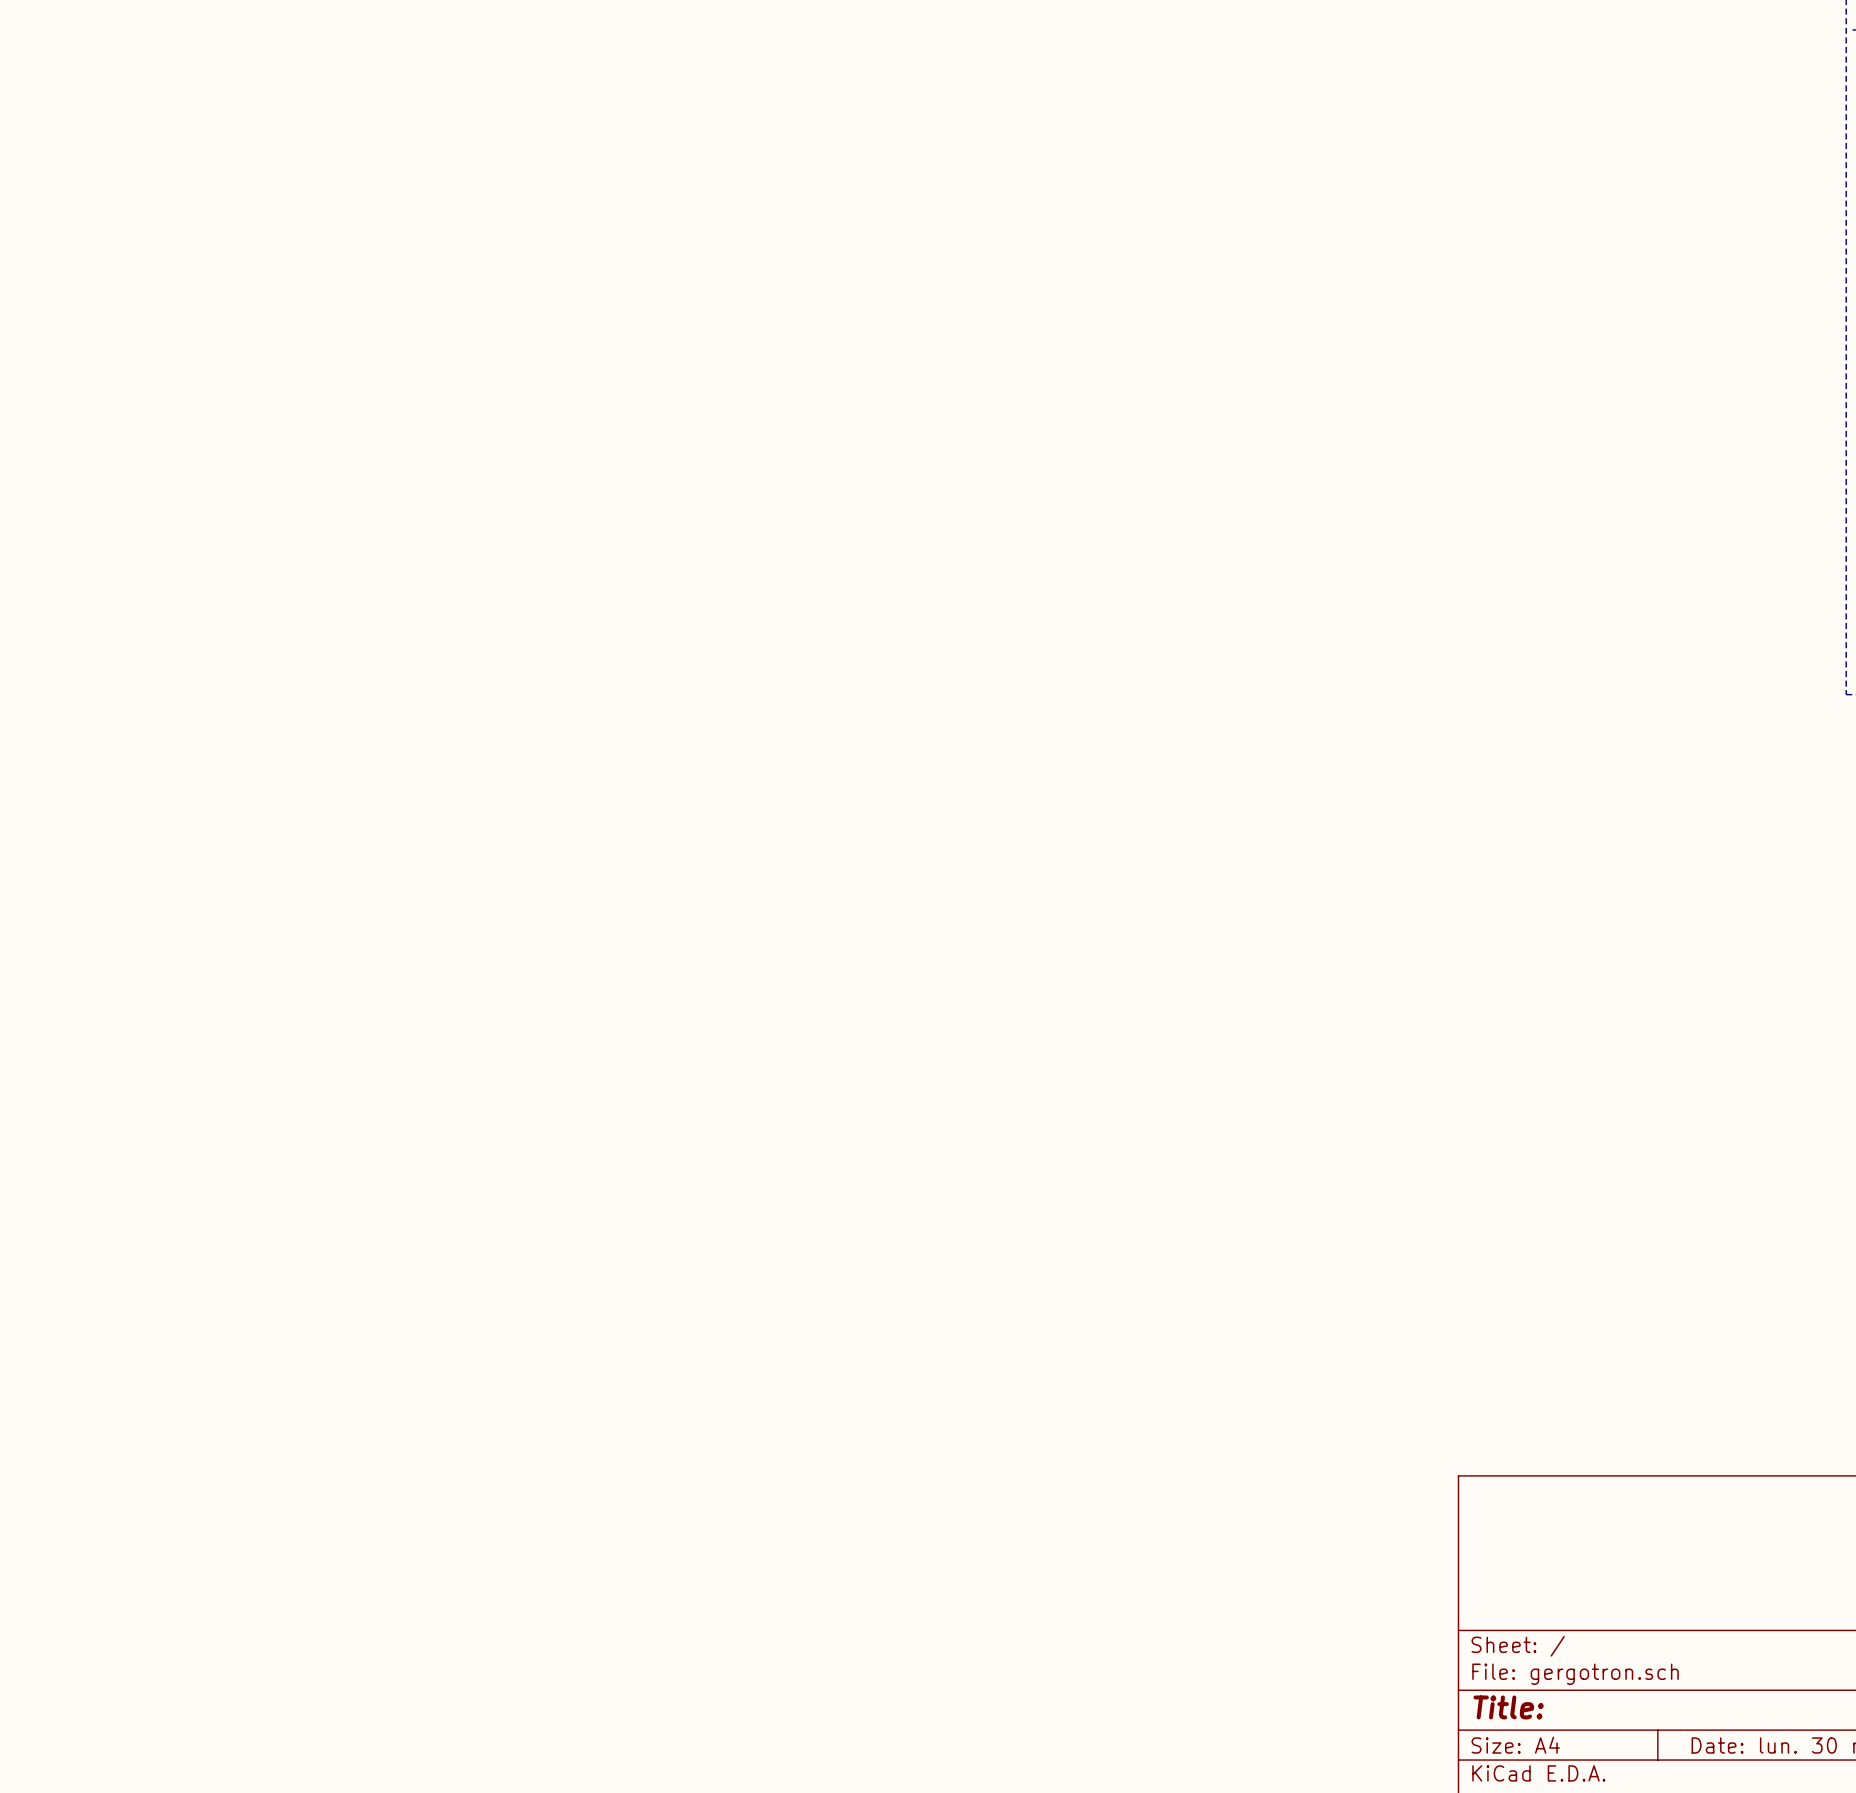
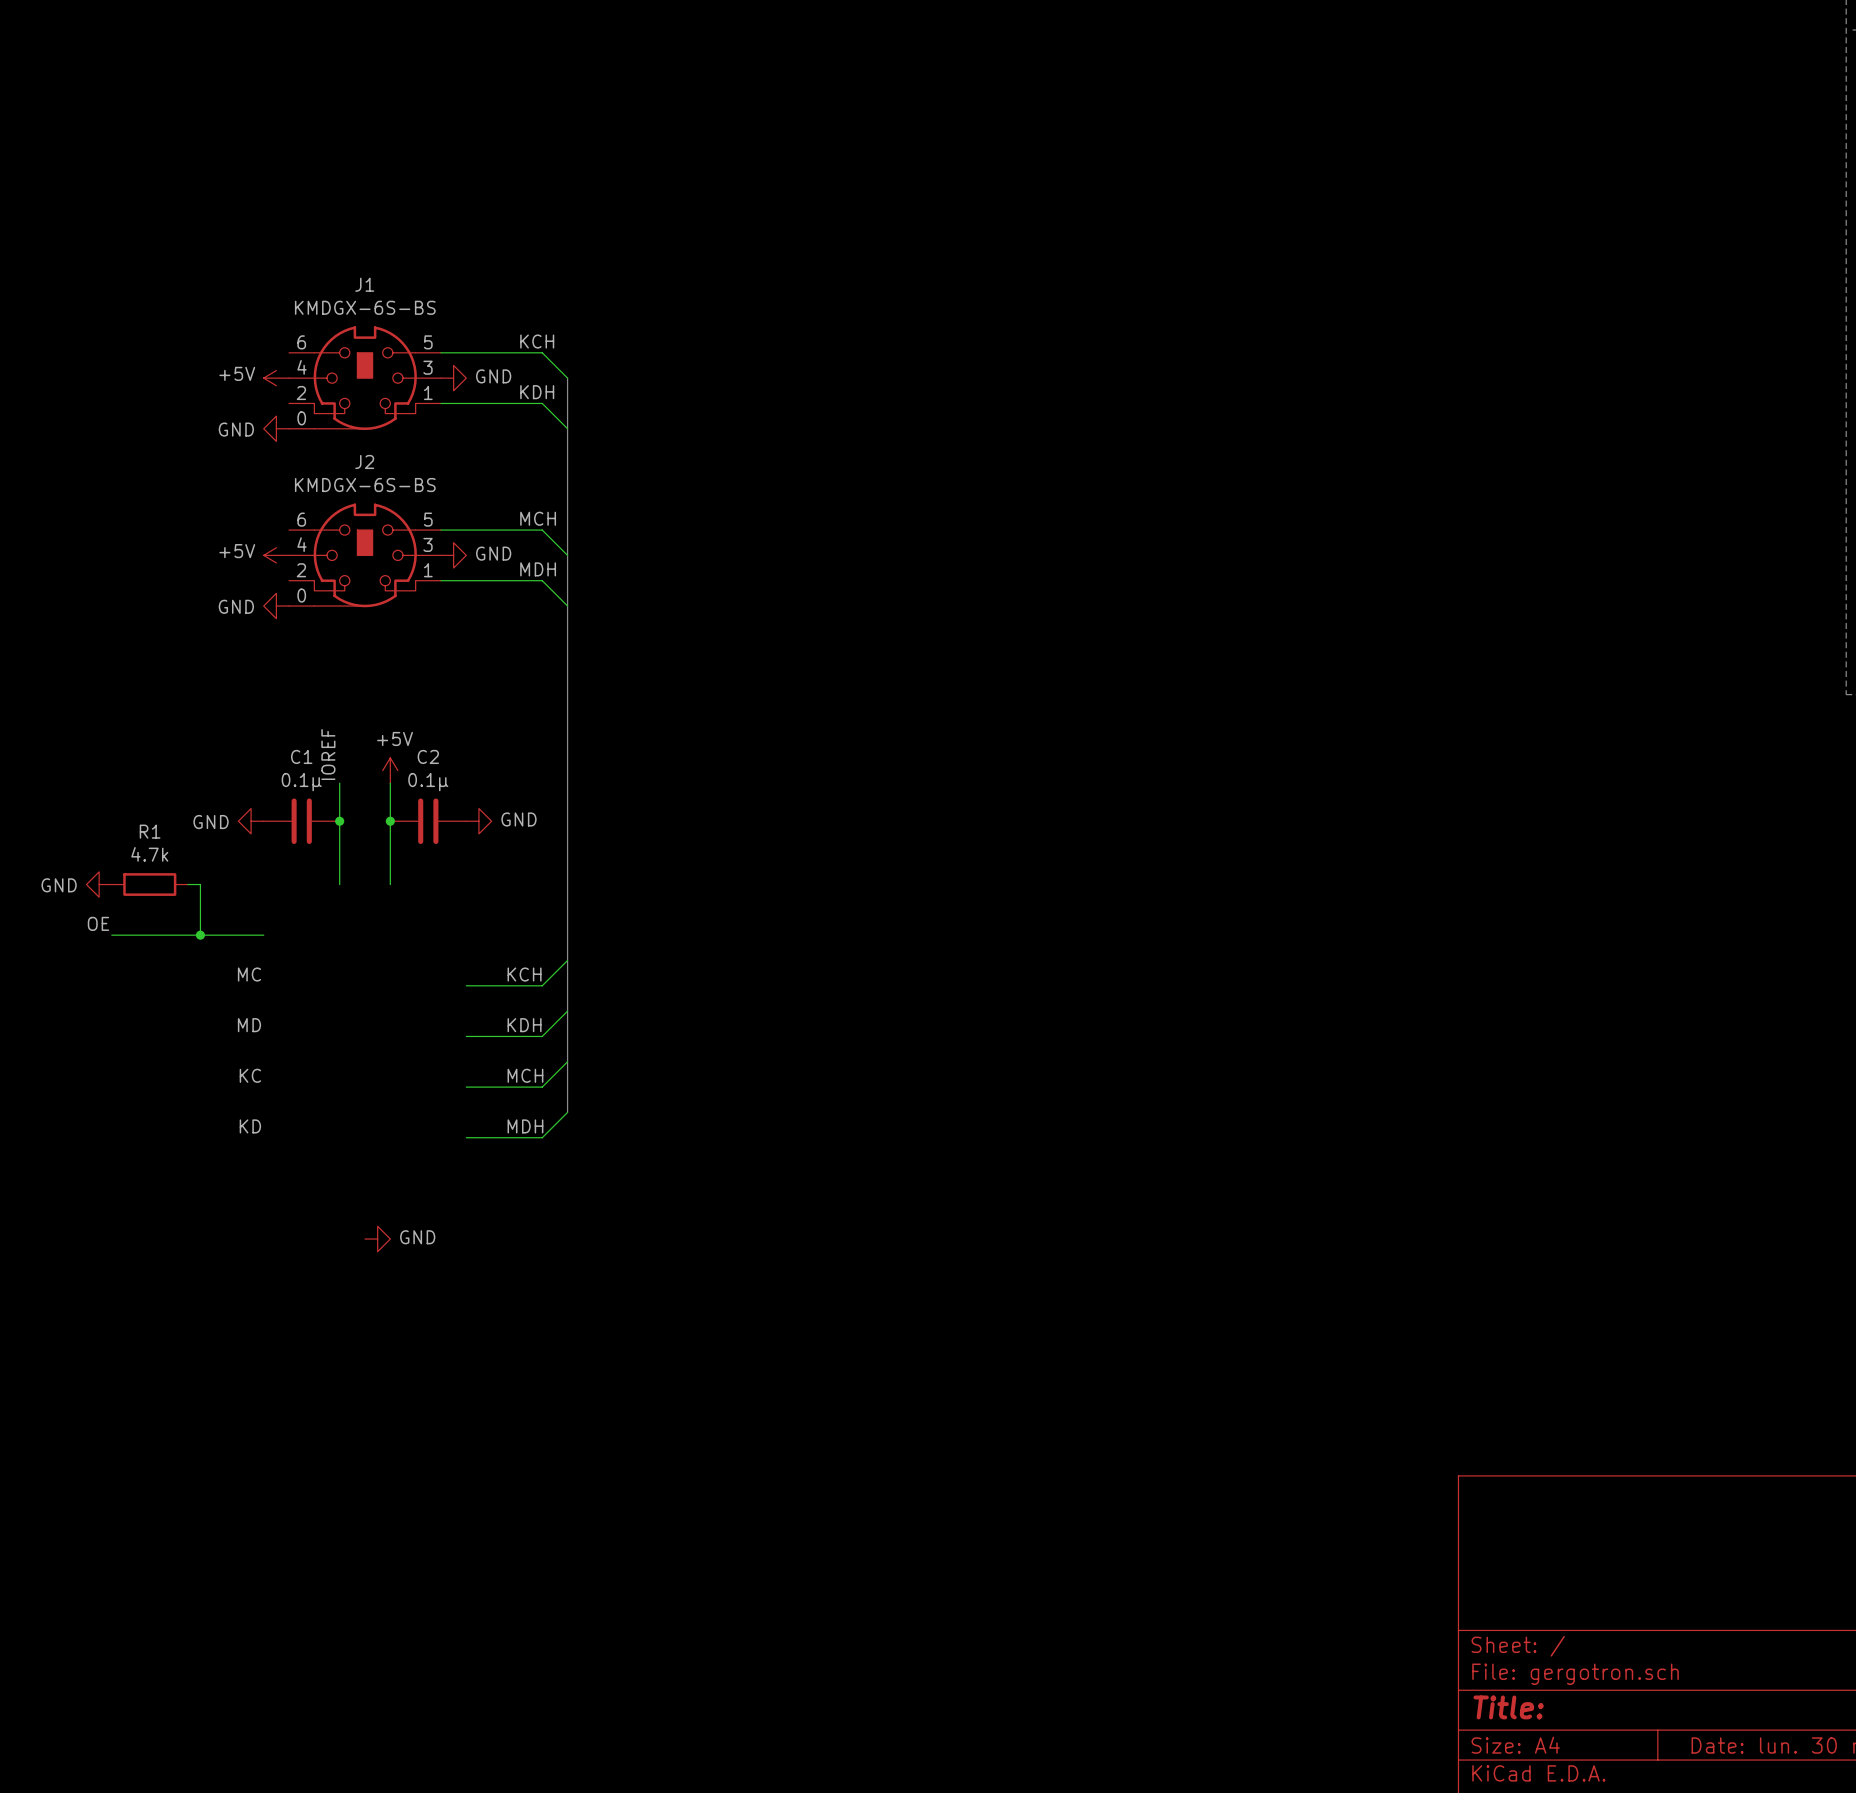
label: none -> KCH (537, 341)
wire: none -> (440, 352) (542, 352) (567, 378)
power symbol: none -> +5V (276, 378)
J1: none -> KMDGX-6S-BS (365, 378)
power symbol: none -> GND (453, 378)
bus: none -> (567, 378) (567, 1112)
label: none -> KDH (537, 392)
wire: none -> (440, 403) (542, 403) (567, 428)
power symbol: none -> GND (276, 428)
label: none -> MCH (538, 518)
wire: none -> (440, 530) (542, 530) (567, 555)
power symbol: none -> +5V (276, 555)
J2: none -> KMDGX-6S-BS (365, 555)
power symbol: none -> GND (453, 555)
label: none -> MDH (538, 569)
wire: none -> (440, 580) (542, 580) (567, 606)
power symbol: none -> GND (276, 606)
label: none -> IOREF (328, 754)
power symbol: none -> +5V (390, 770)
wire: none -> (339, 783) (339, 884)
wire: none -> (390, 783) (390, 884)
power symbol: none -> GND (251, 821)
C1: none -> 0.1μ (301, 821)
junction: none -> (339, 821)
junction: none -> (390, 821)
C2: none -> 0.1μ (428, 821)
power symbol: none -> GND (478, 821)
power symbol: none -> GND (99, 884)
R1: none -> 4.7k (149, 884)
wire: none -> (187, 884) (200, 884) (200, 935)
label: none -> OE (98, 923)
wire: none -> (111, 935) (263, 935)
junction: none -> (200, 935)
wire: none -> (567, 960) (542, 985) (466, 985)
label: none -> MC (249, 974)
label: none -> KCH (524, 974)
wire: none -> (567, 1011) (542, 1036) (466, 1036)
label: none -> MD (249, 1025)
label: none -> KDH (524, 1025)
wire: none -> (567, 1061) (542, 1087) (466, 1087)
label: none -> KC (250, 1075)
label: none -> MCH (525, 1075)
wire: none -> (567, 1112) (542, 1137) (466, 1137)
label: none -> KD (250, 1126)
label: none -> MDH (525, 1126)
power symbol: none -> GND (377, 1239)

